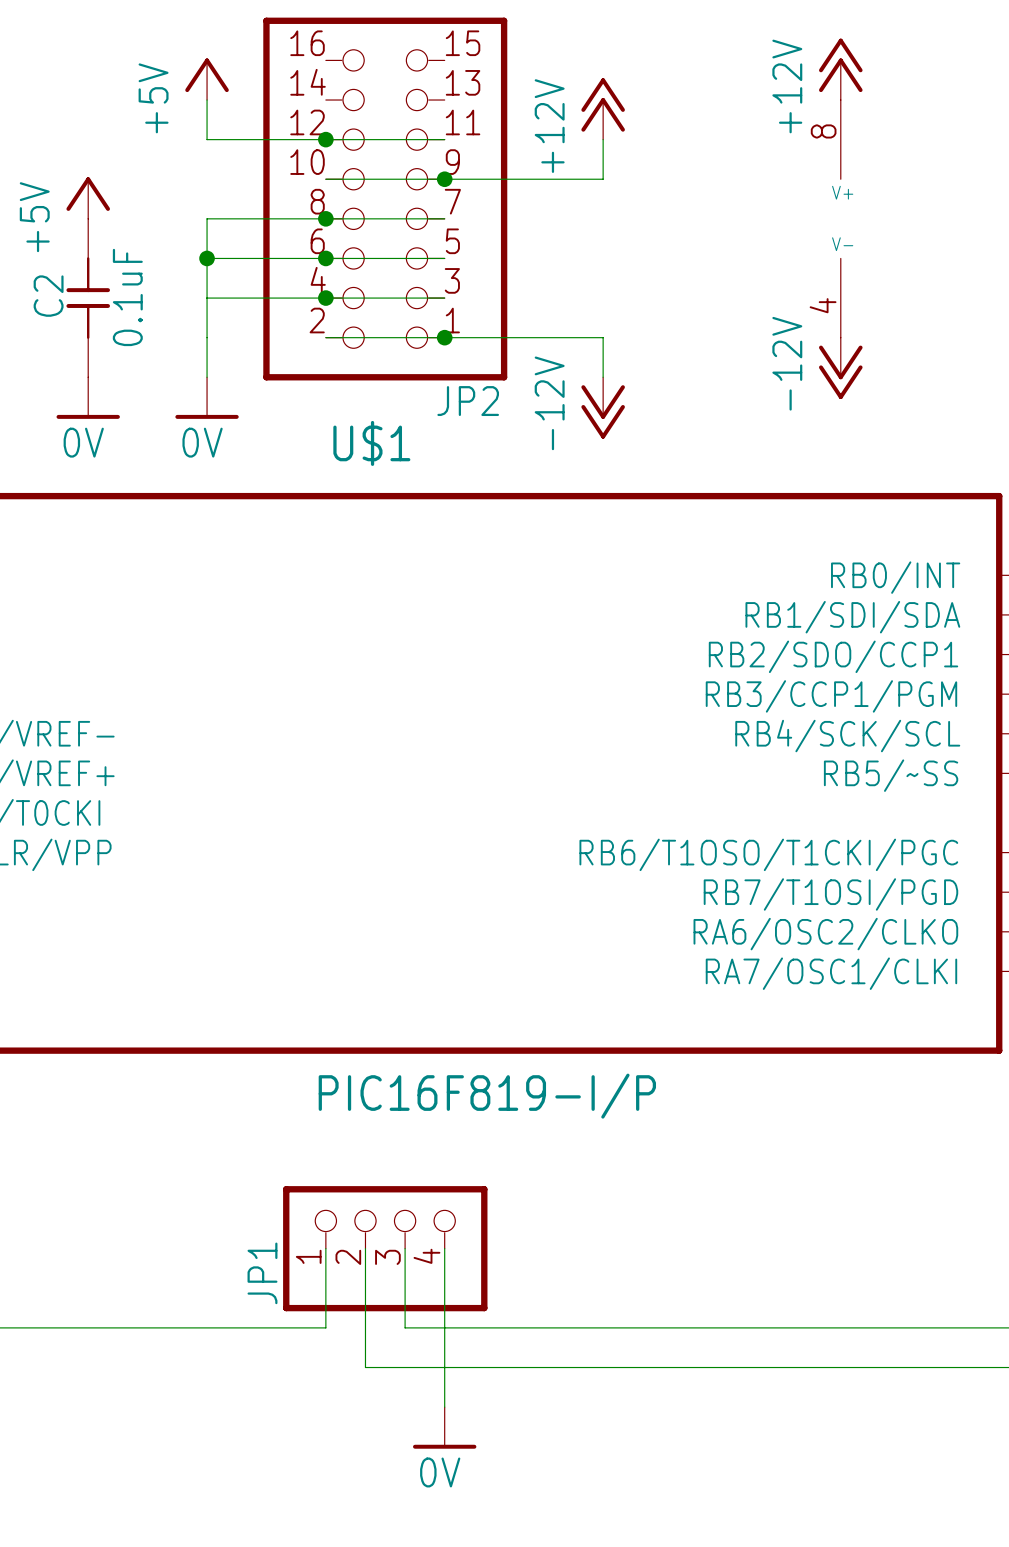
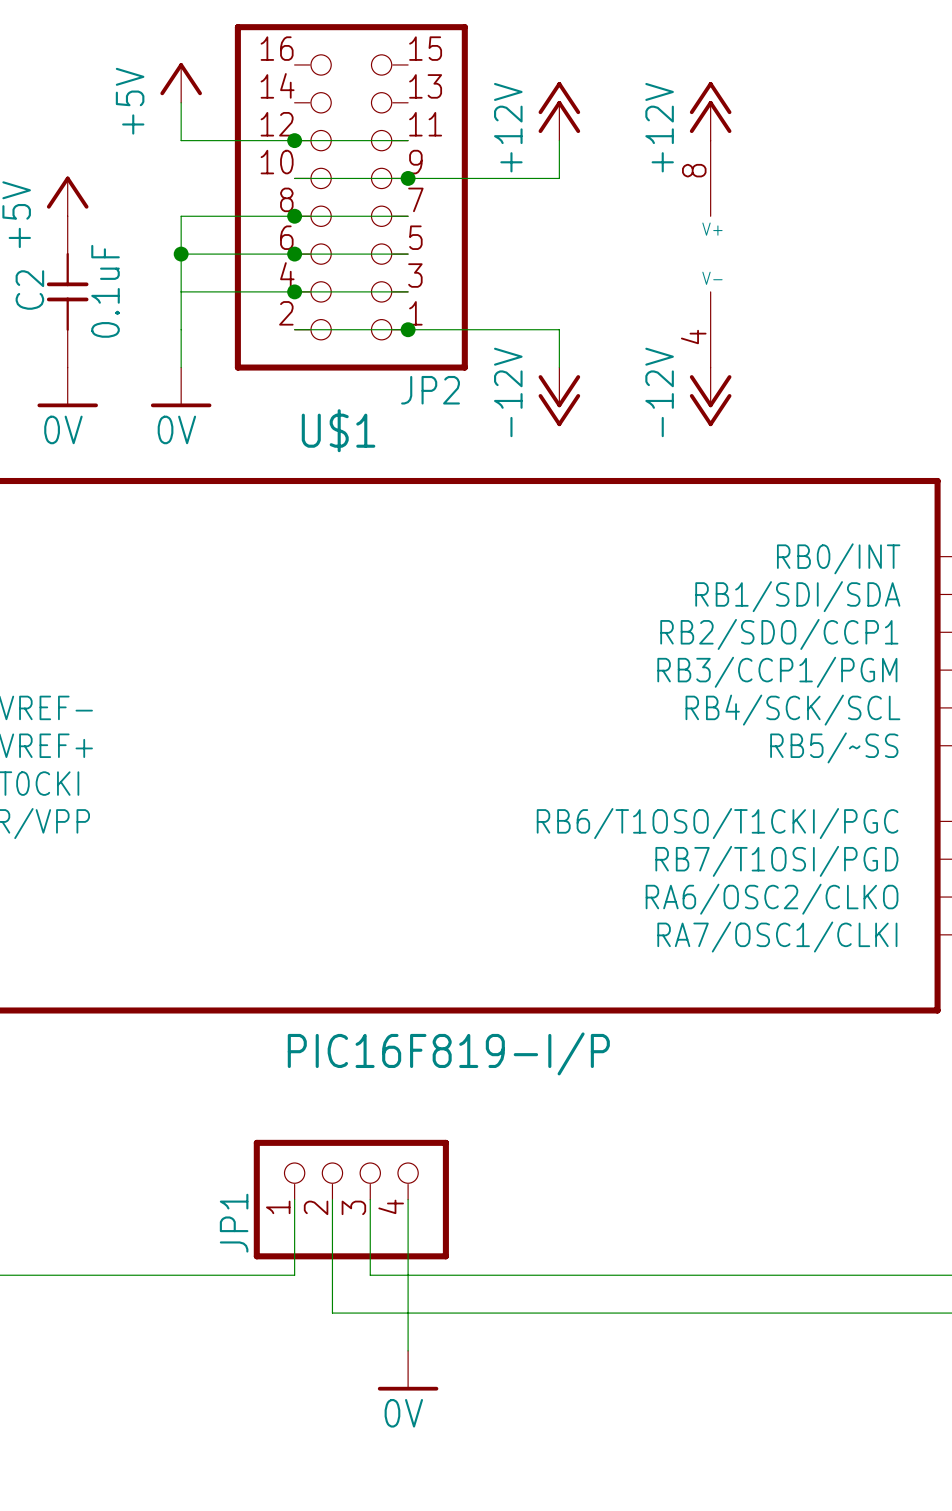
power symbol position: +12V (840, 69) -> +12V (710, 111)
part position: (840, 218) -> (710, 254)
power symbol position: -12V (840, 368) -> -12V (710, 396)

